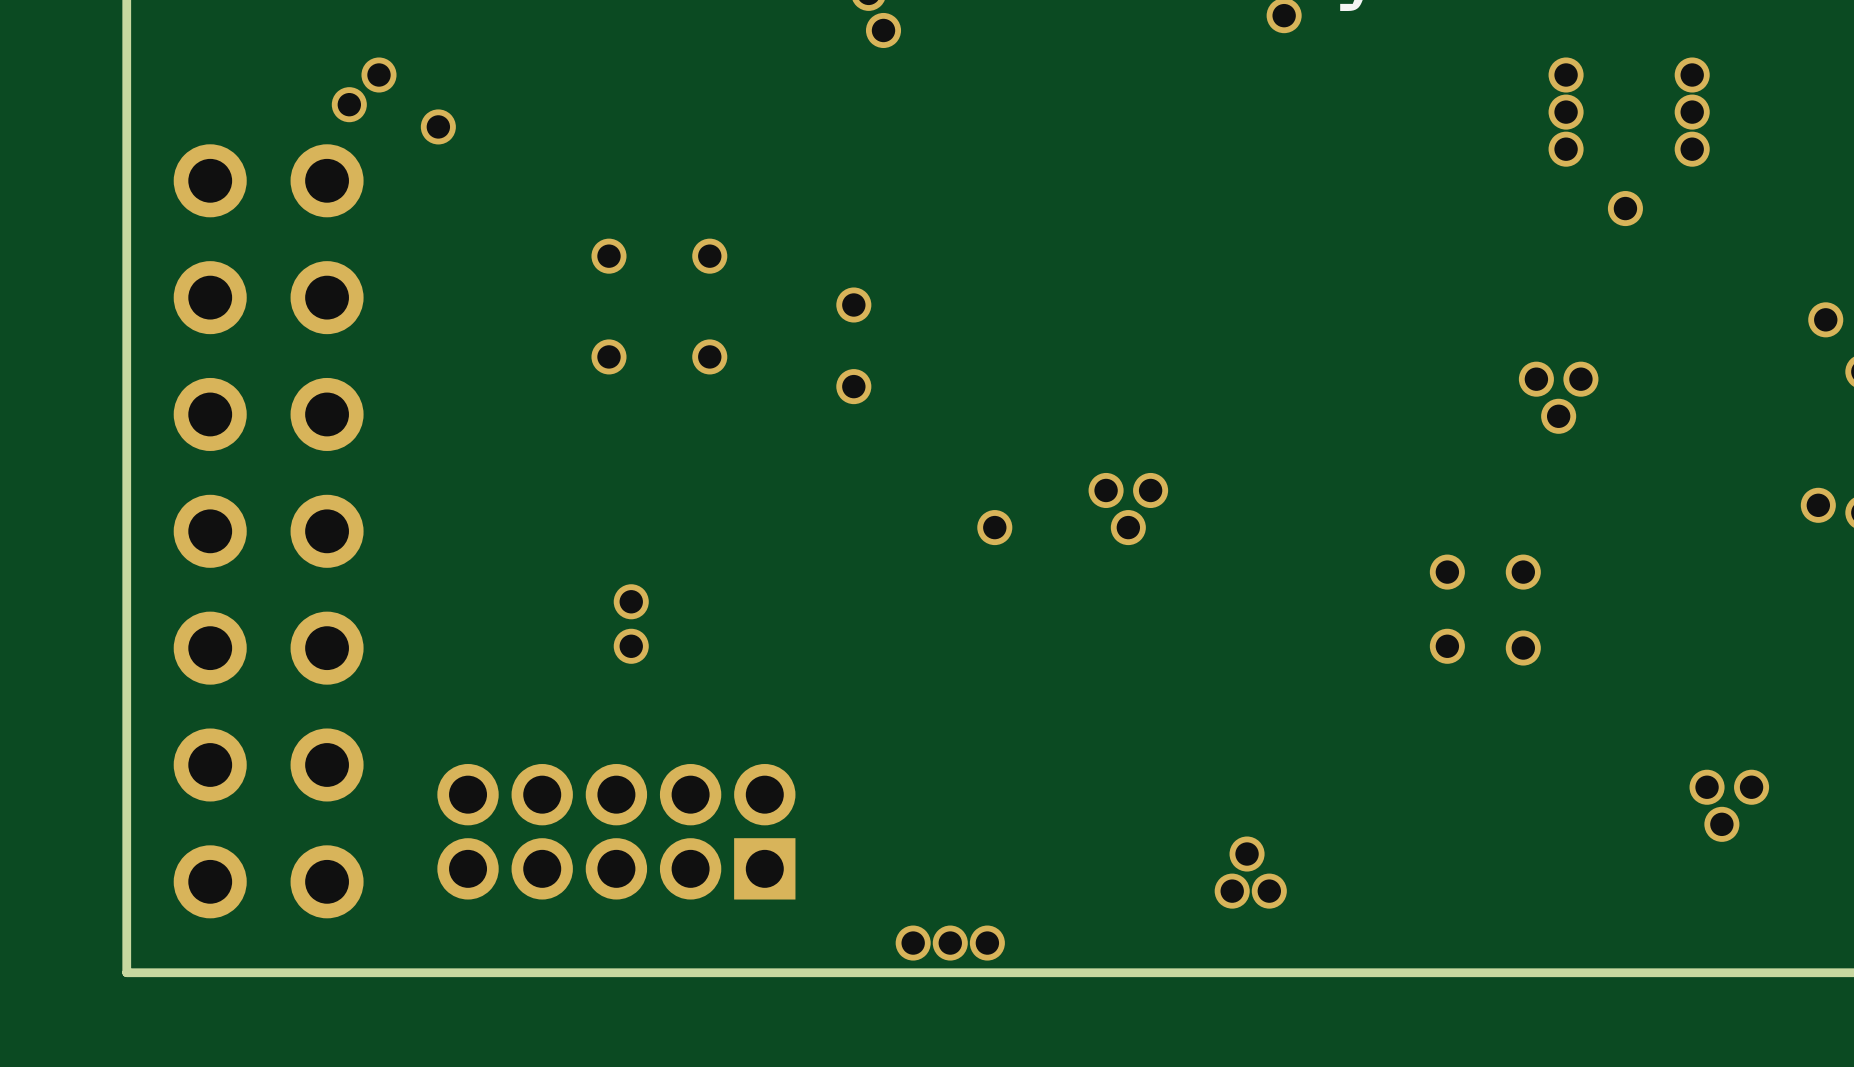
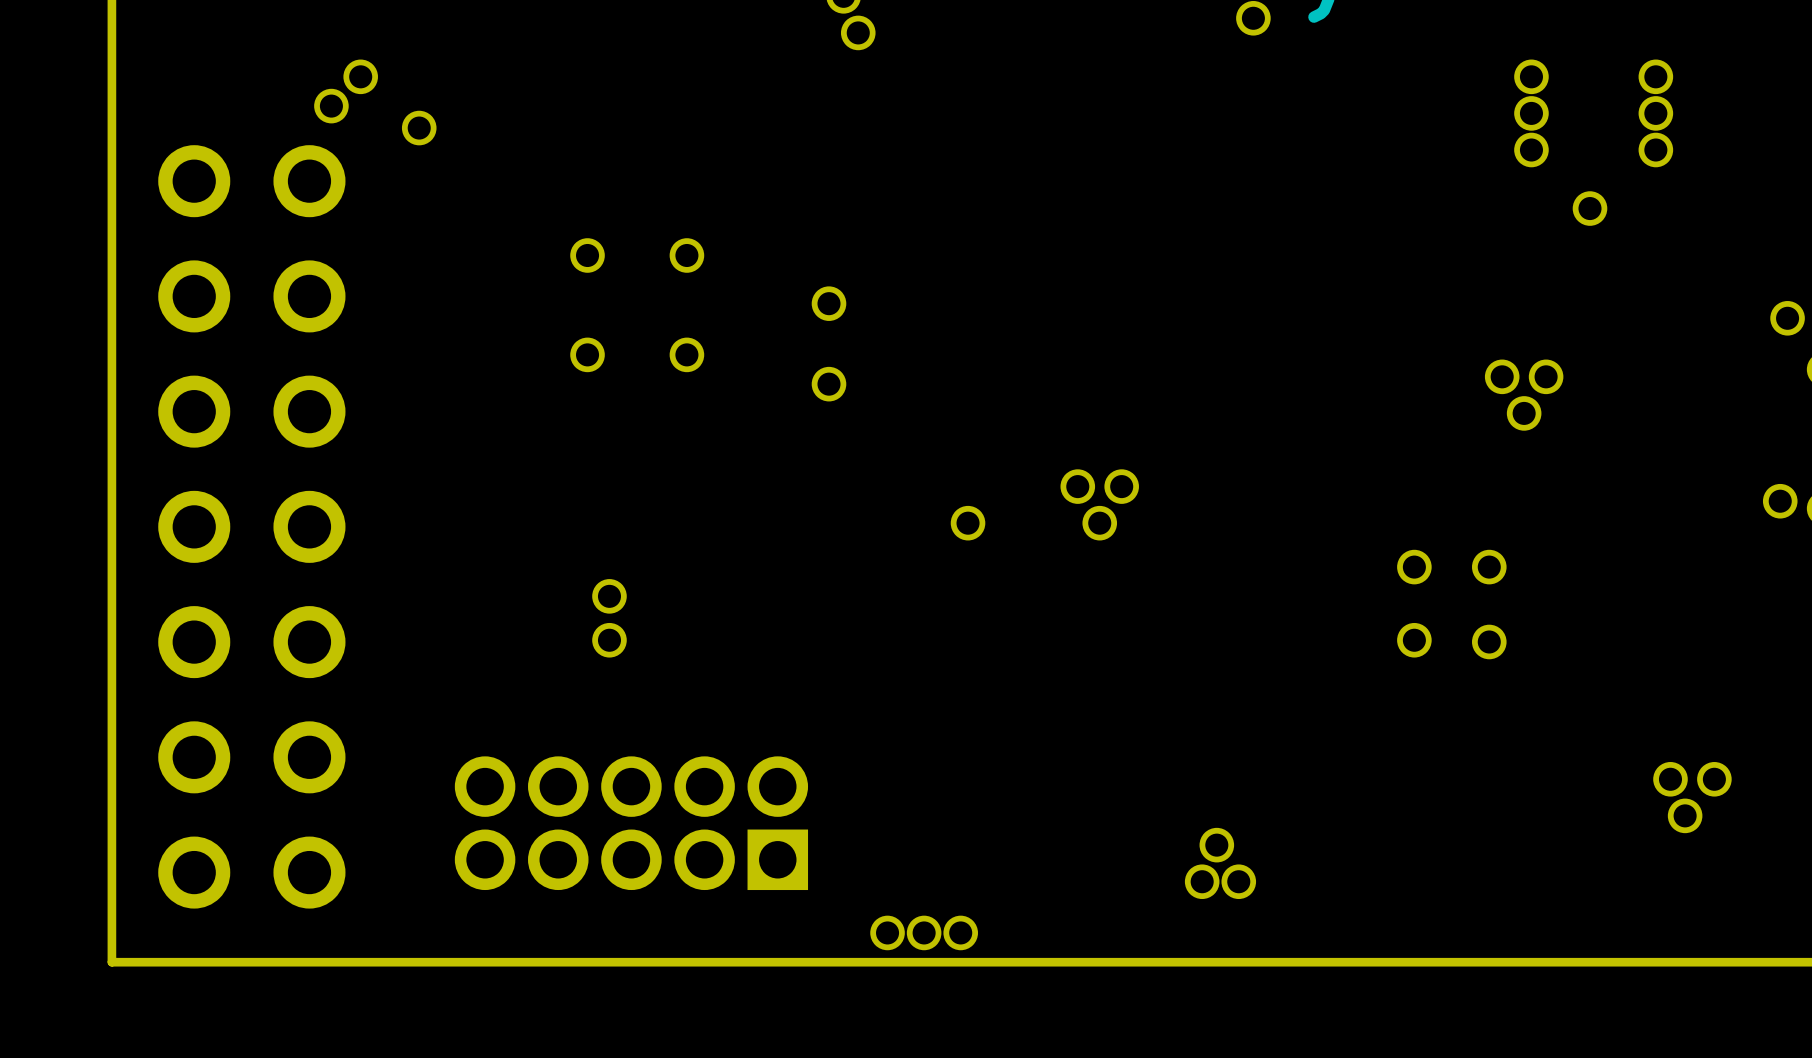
part position: (616, 831) -> (631, 823)

